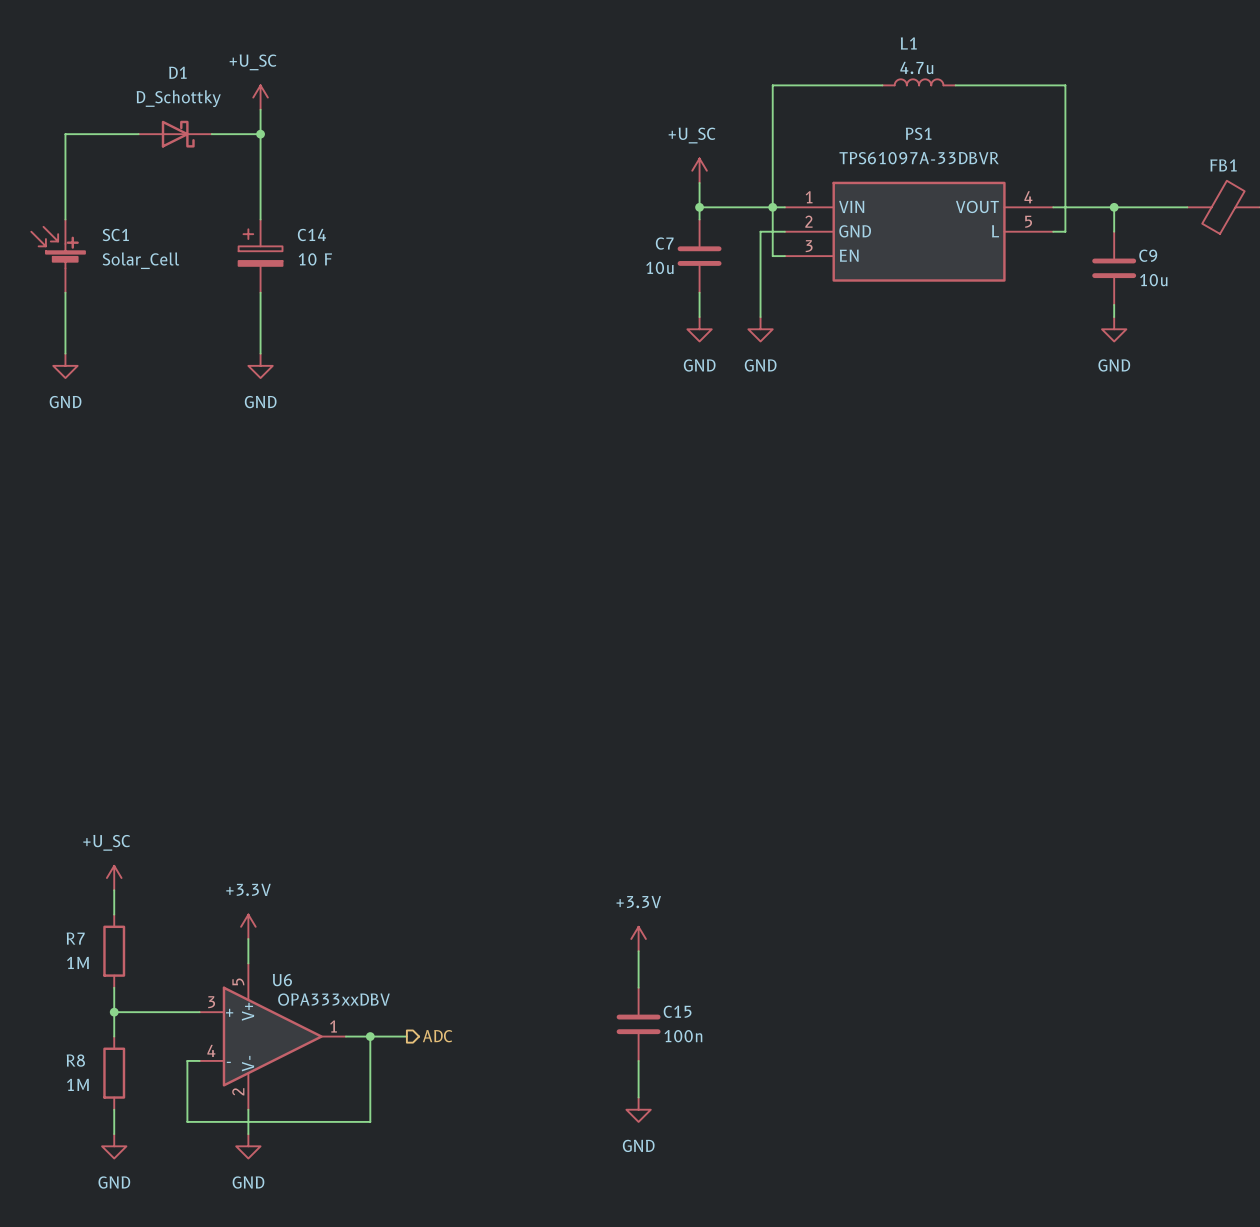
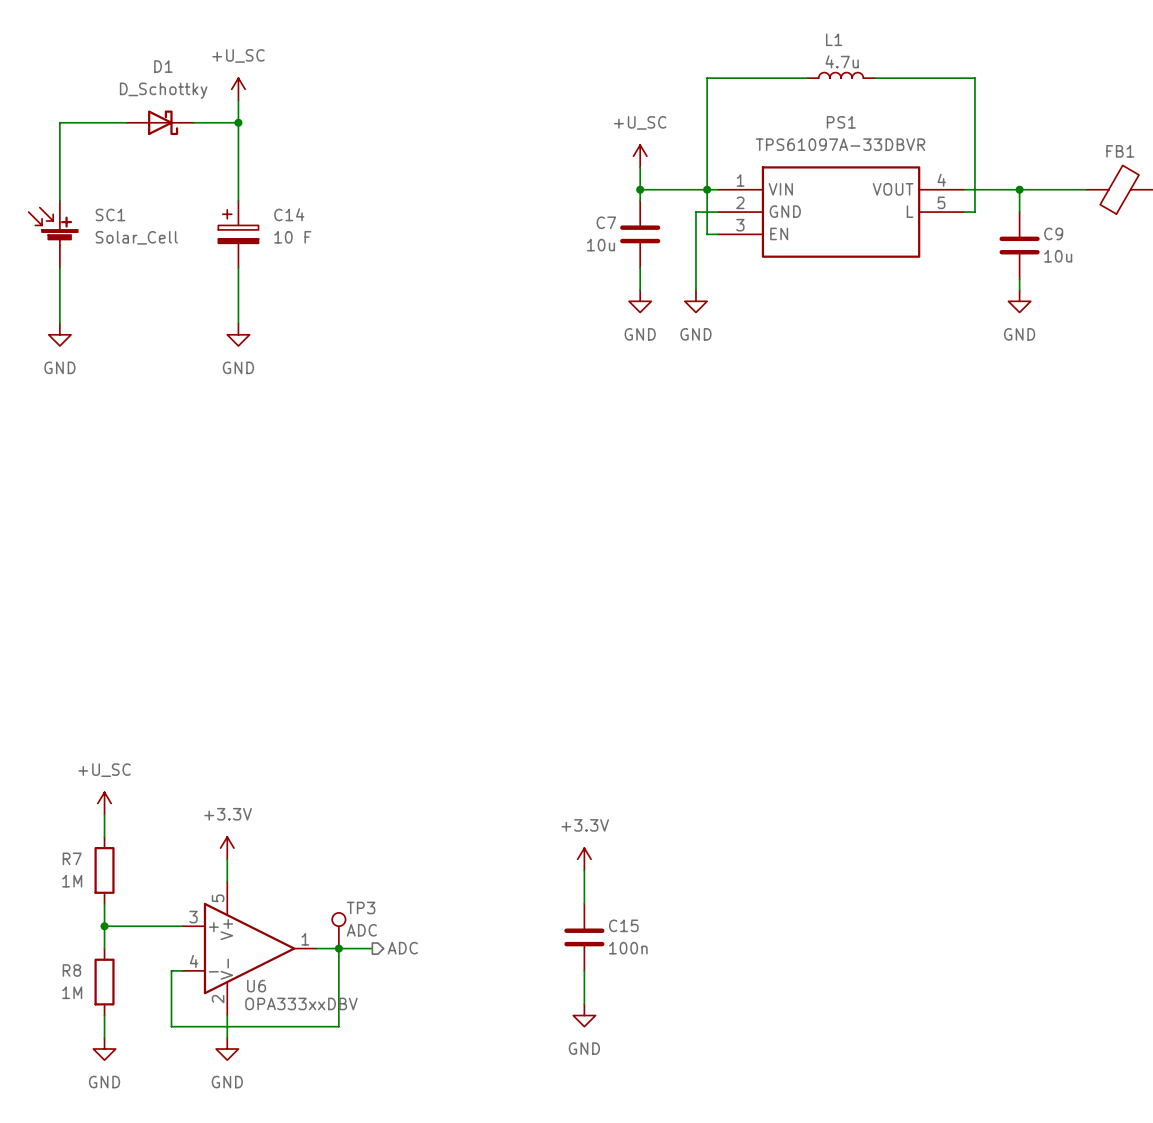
U6 name position: U6 (282, 980) -> U6 (256, 986)
U6 value position: OPA333xxDBV (333, 999) -> OPA333xxDBV (301, 1003)
TP3: none -> ADC (338, 930)

